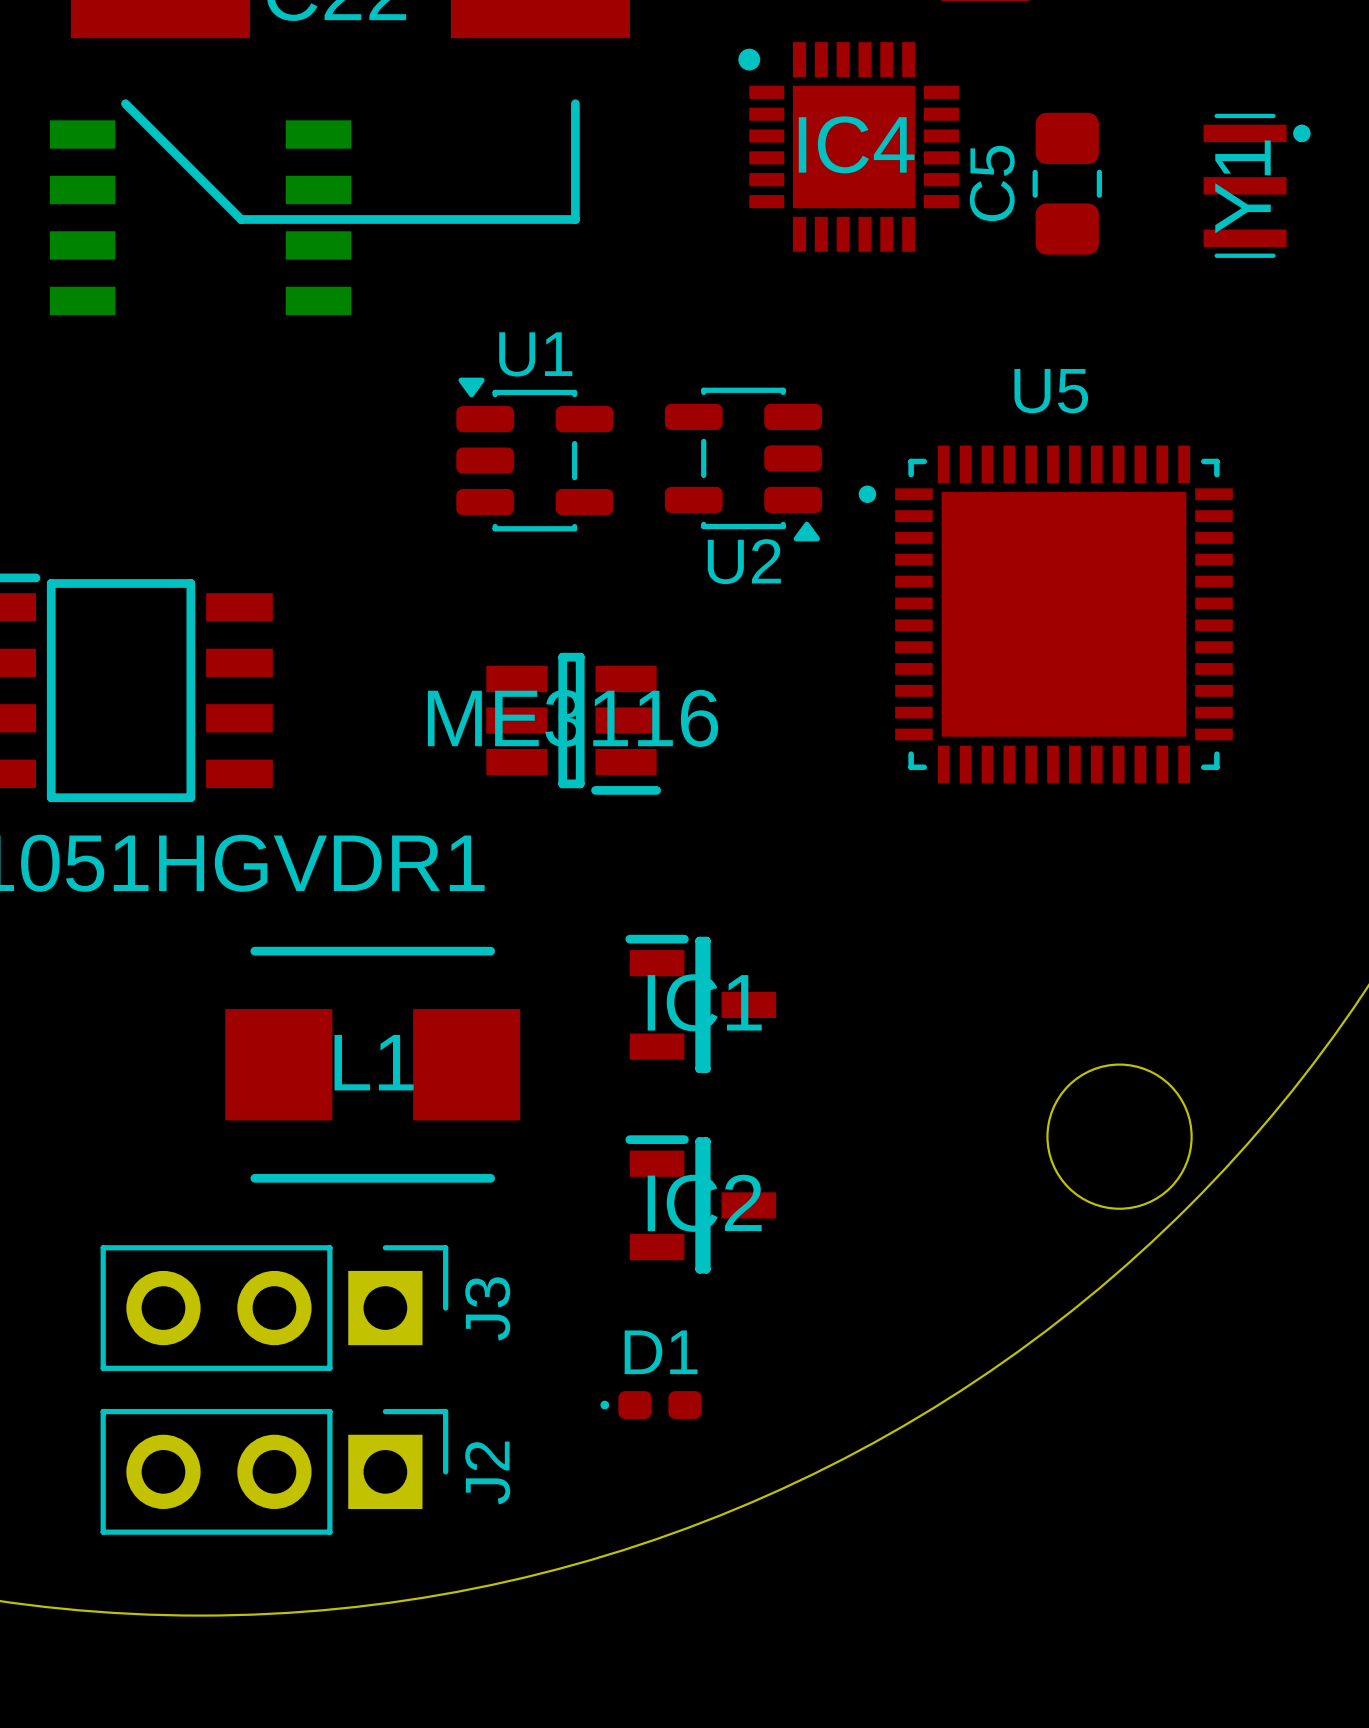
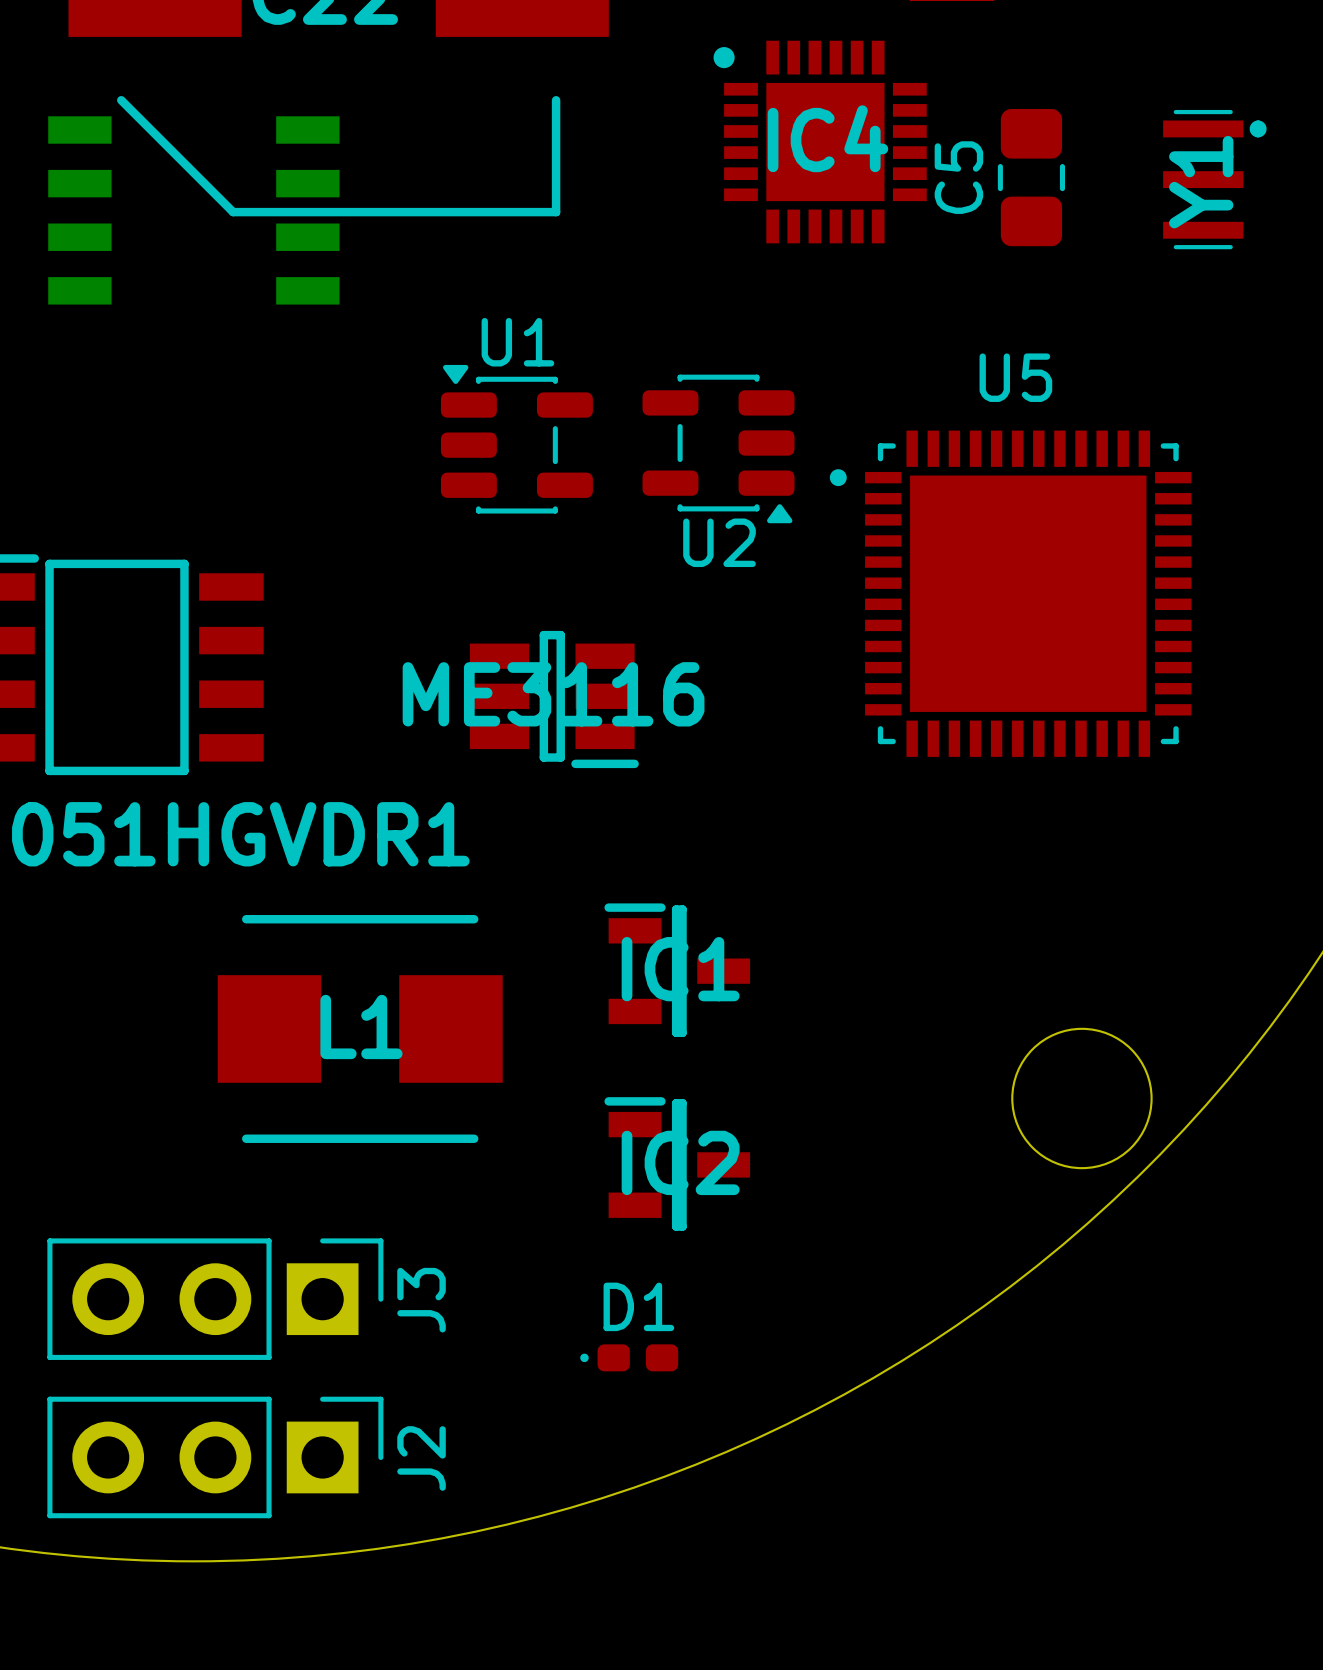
J3 position: (274, 1308) -> (215, 1299)
J2 position: (274, 1471) -> (215, 1457)

